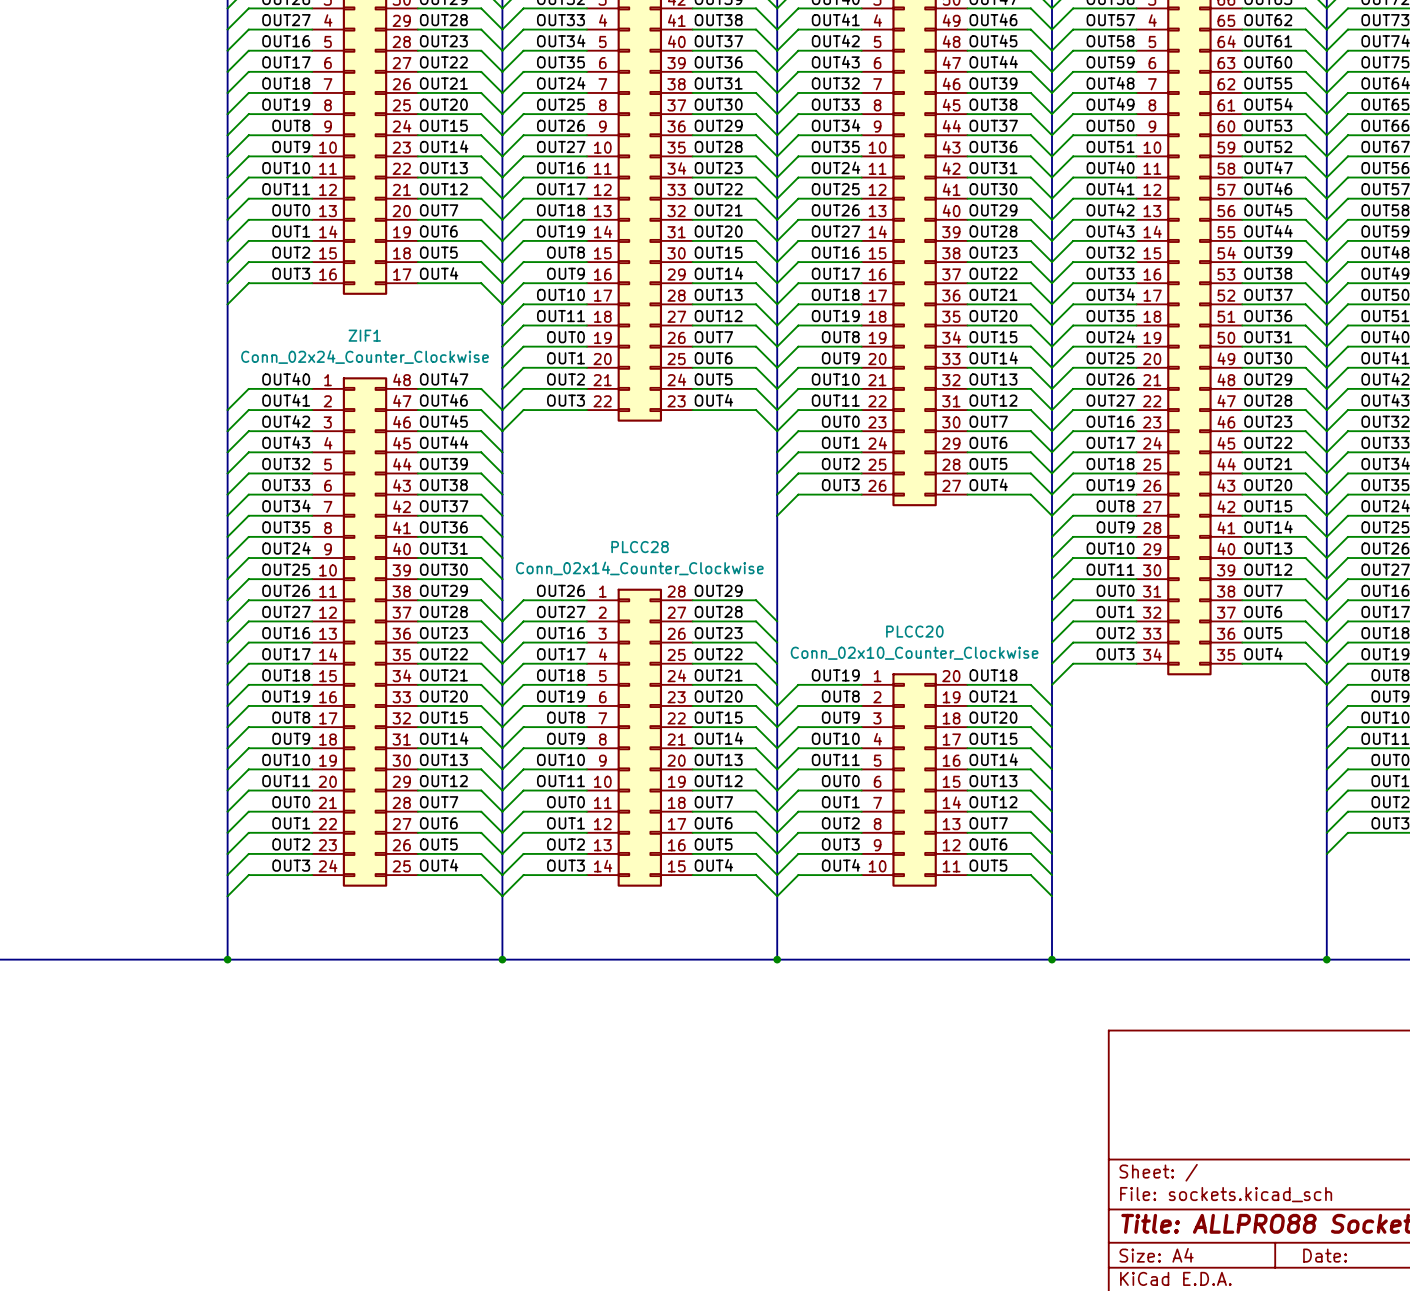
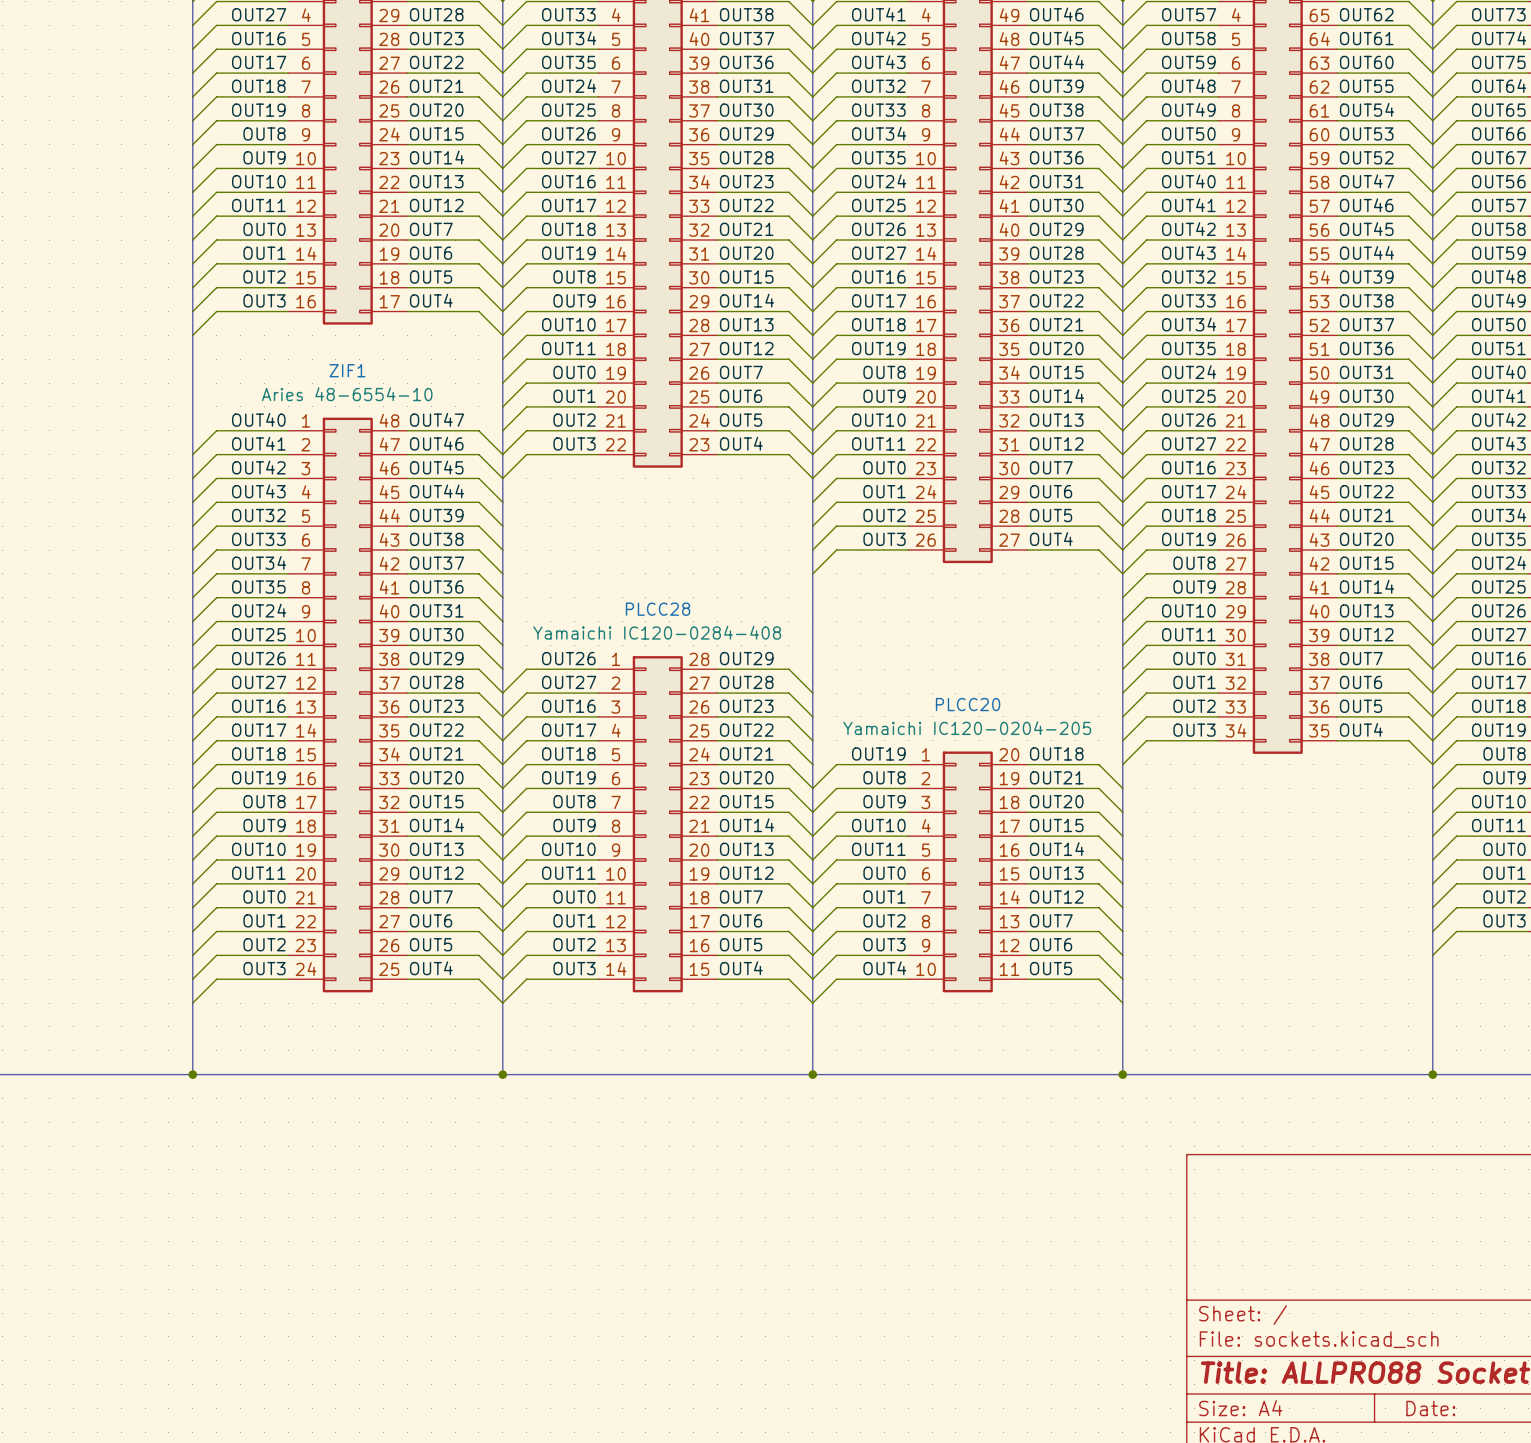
ZIF1 value: Conn_02x24_Counter_Clockwise (365, 357) -> Aries 48-6554-10 (347, 394)
PLCC28 value: Conn_02x14_Counter_Clockwise (639, 568) -> Yamaichi IC120-0284-408 (657, 632)
PLCC20 value: Conn_02x10_Counter_Clockwise (914, 653) -> Yamaichi IC120-0204-205 (967, 728)

